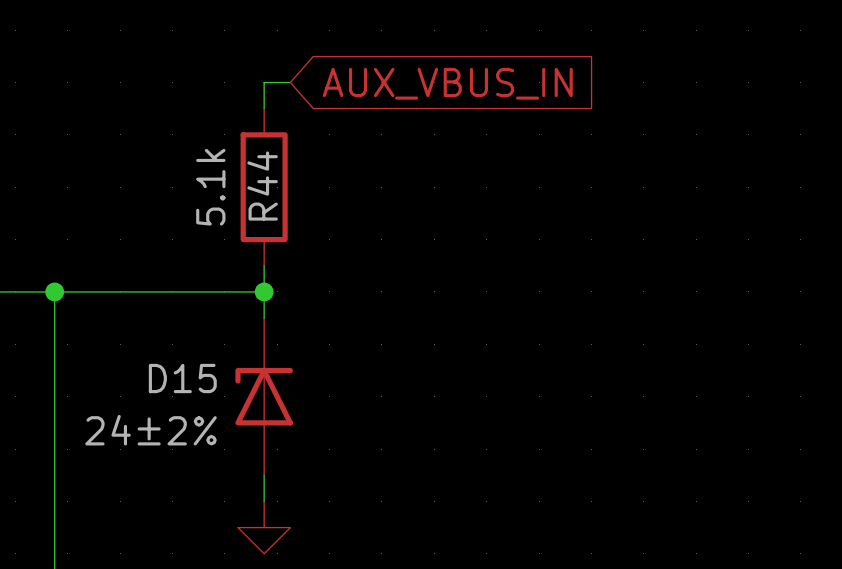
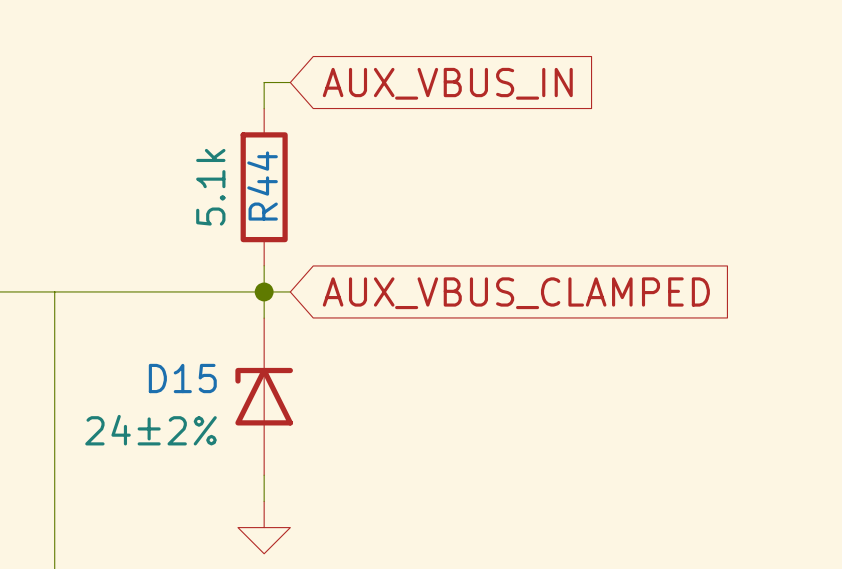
junction: (54, 291) -> none
wire: none -> (264, 291) (290, 291)
global label: none -> AUX_VBUS_CLAMPED (516, 293)

